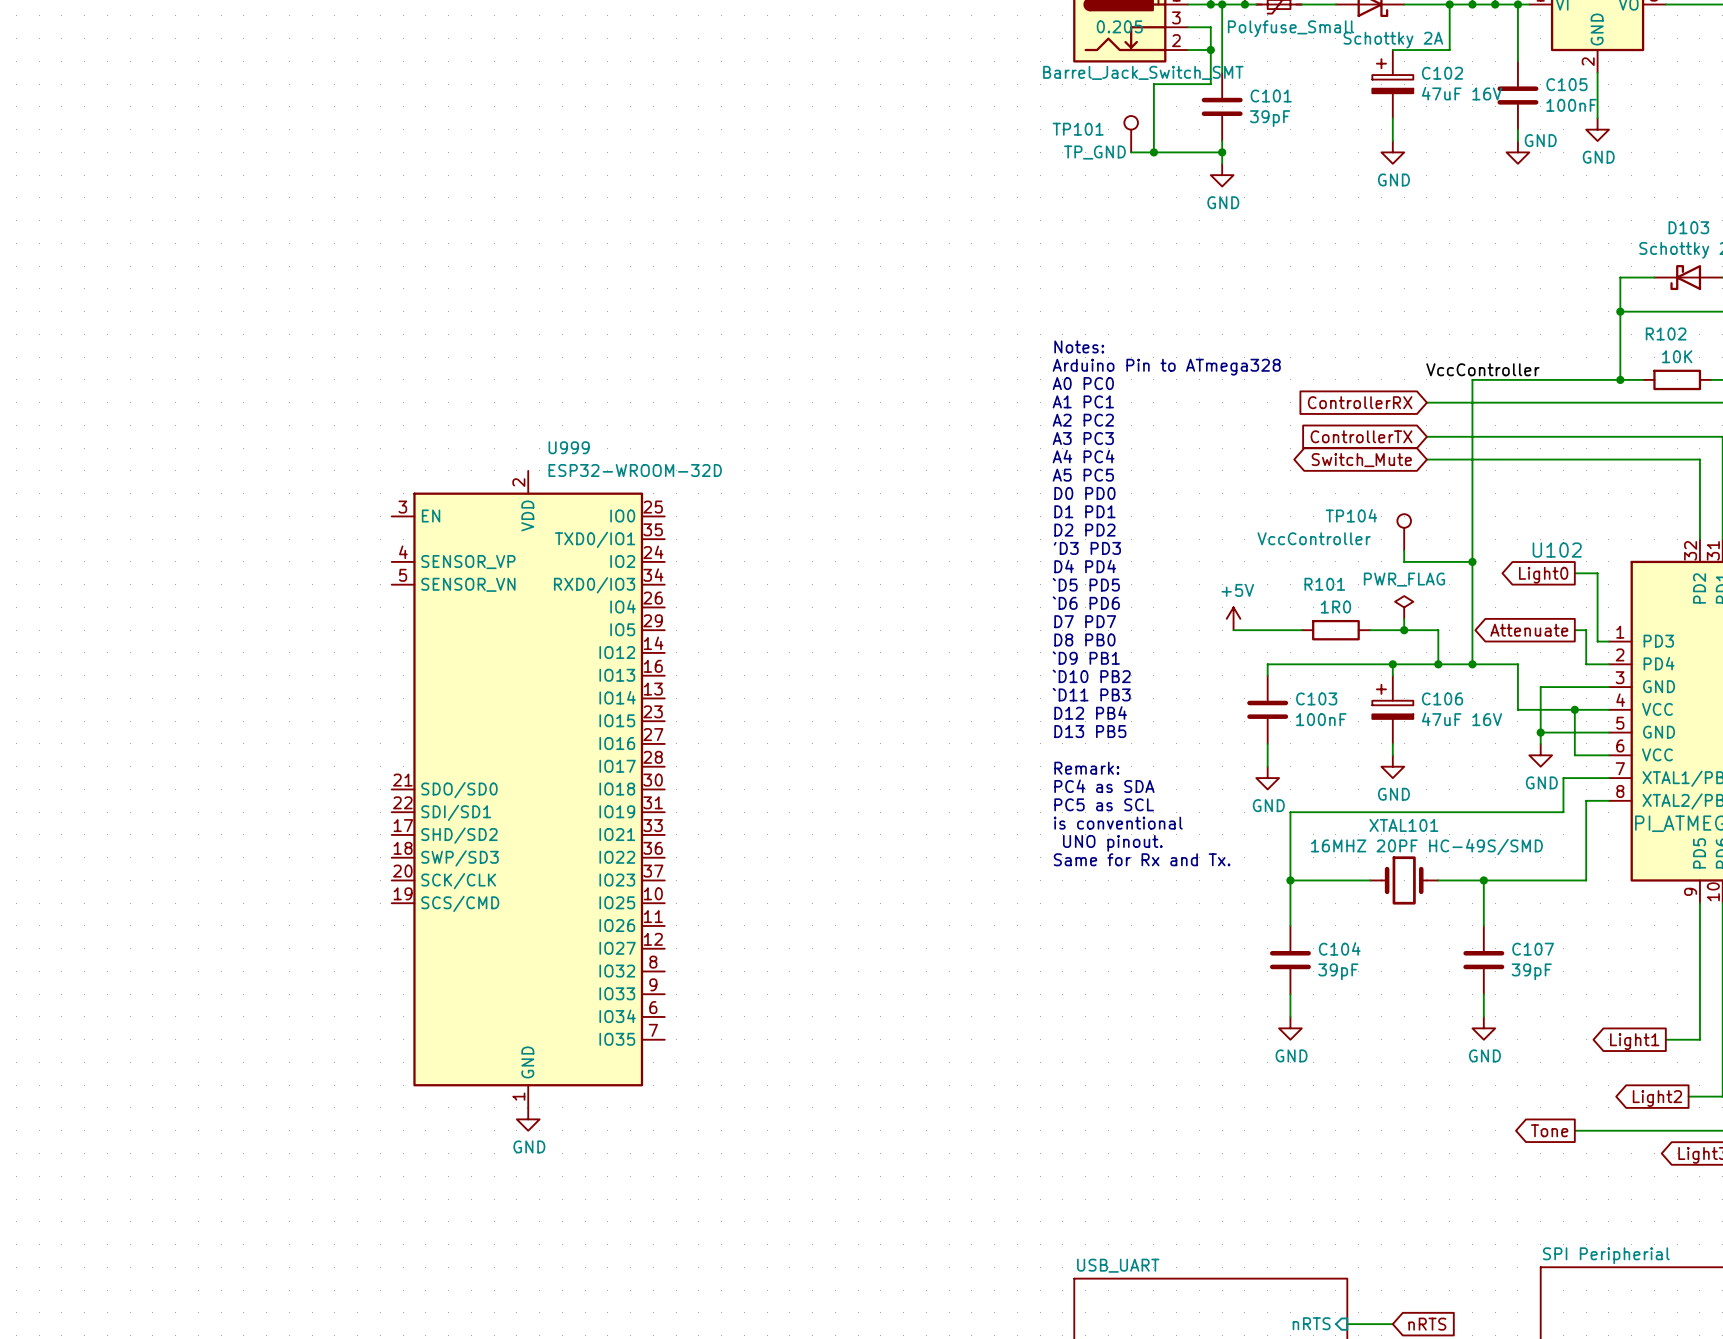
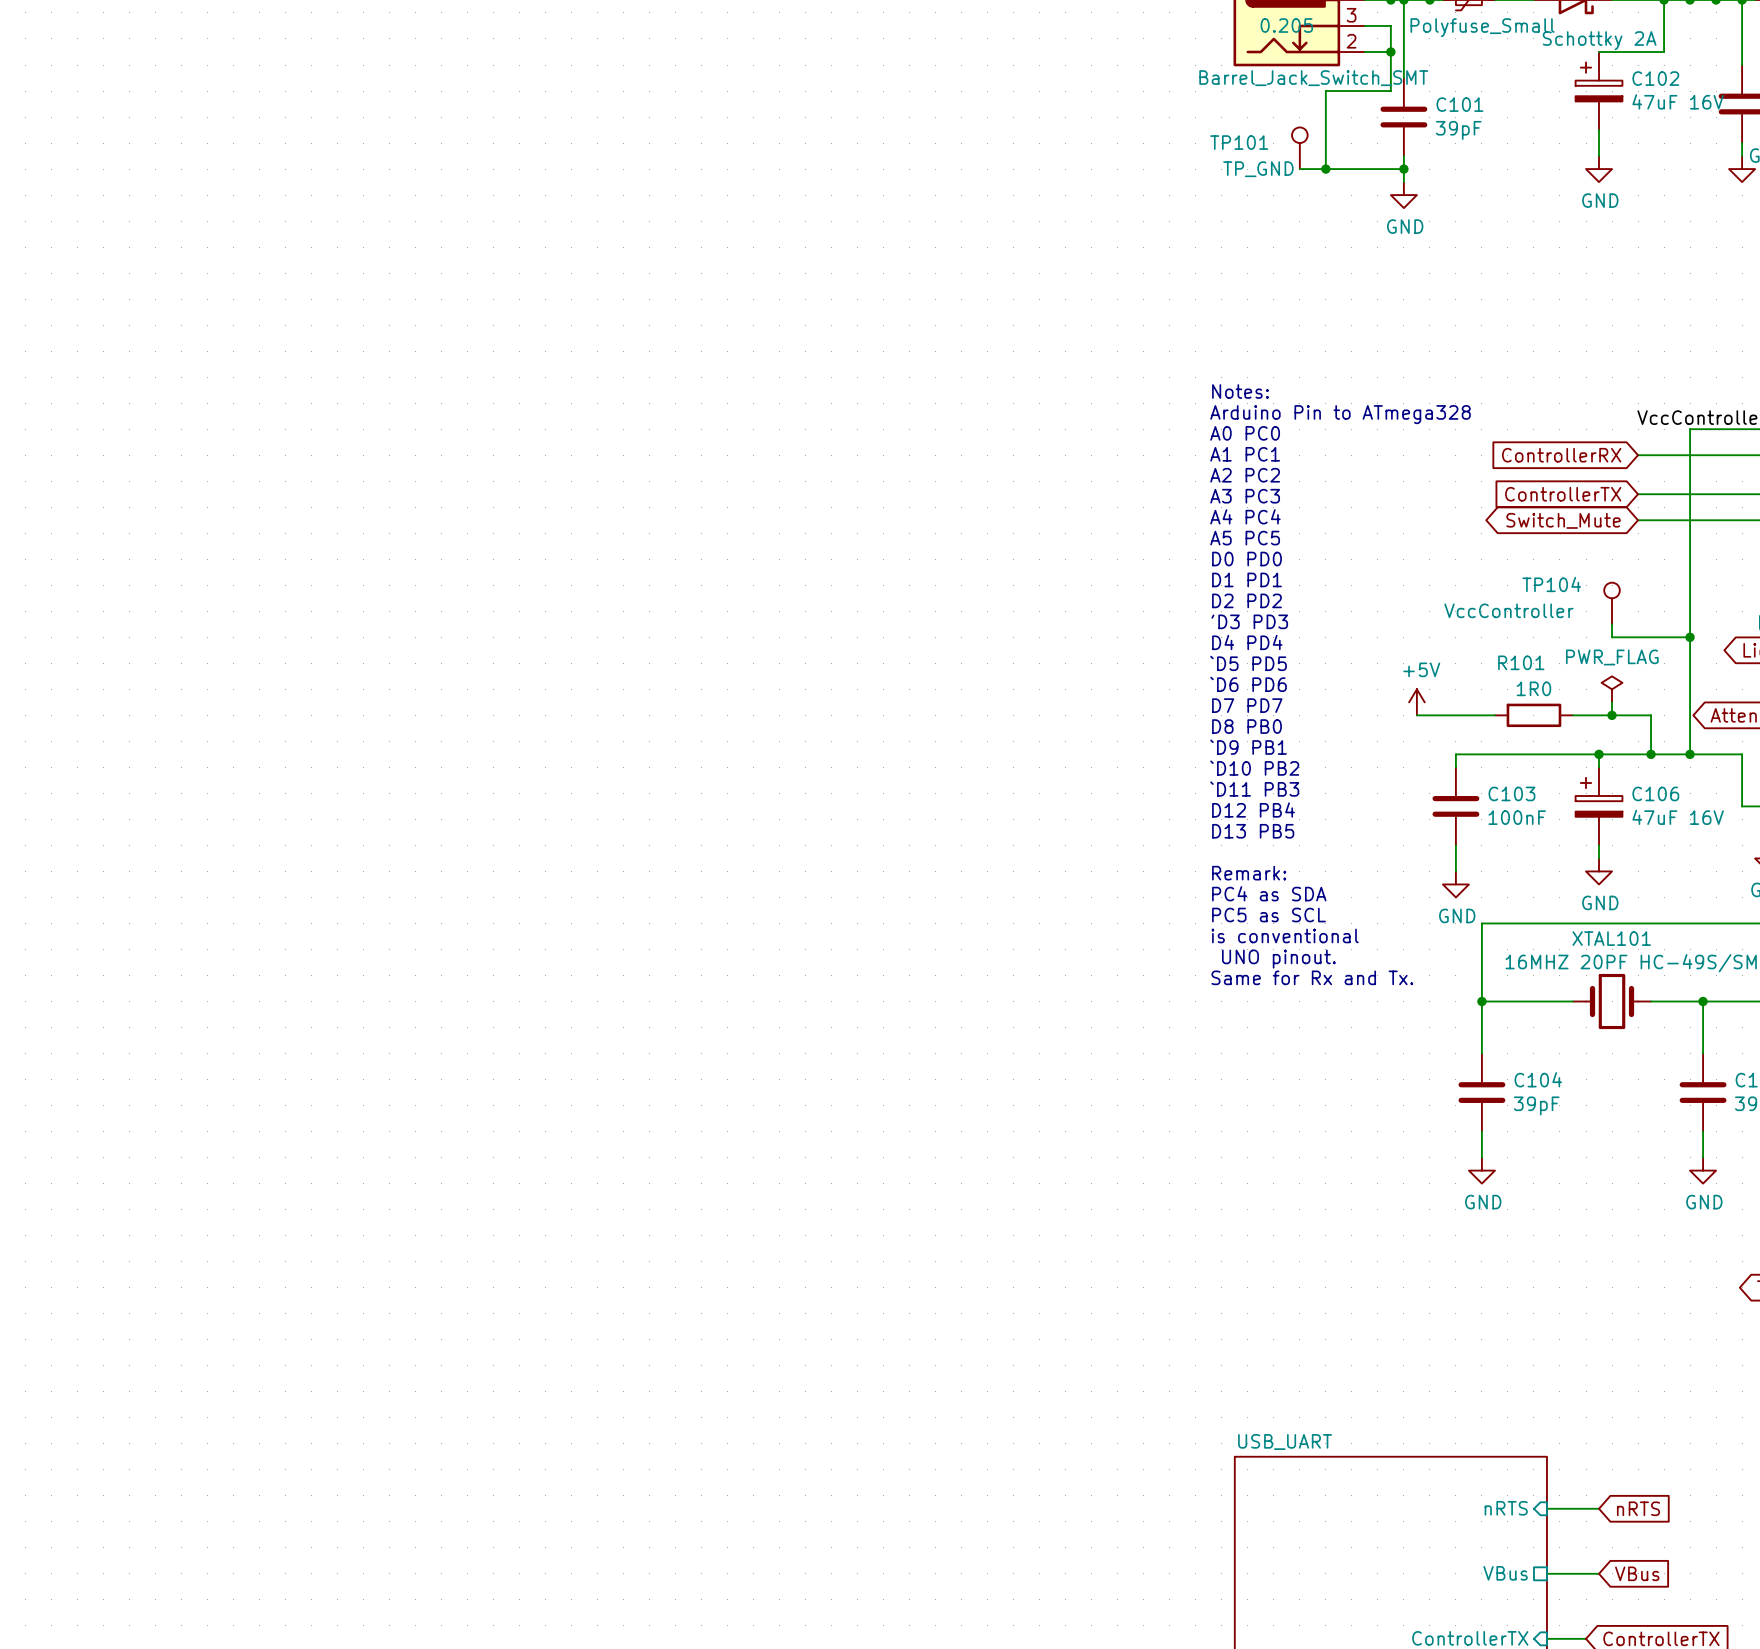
U999: ESP32-WROOM-32D (528, 789) -> none
power symbol: GND (528, 1119) -> none

